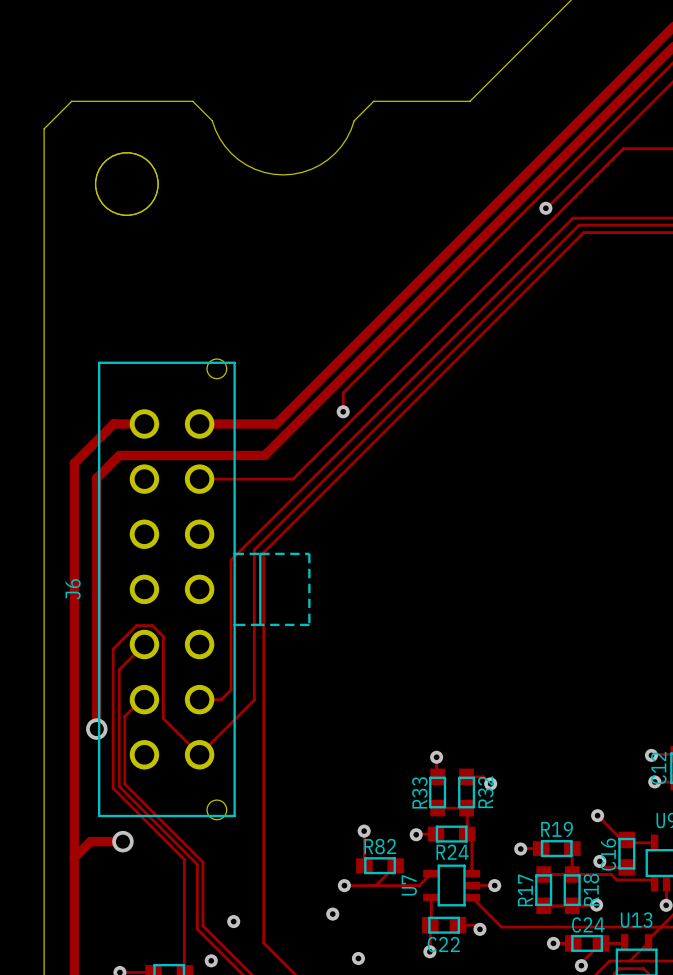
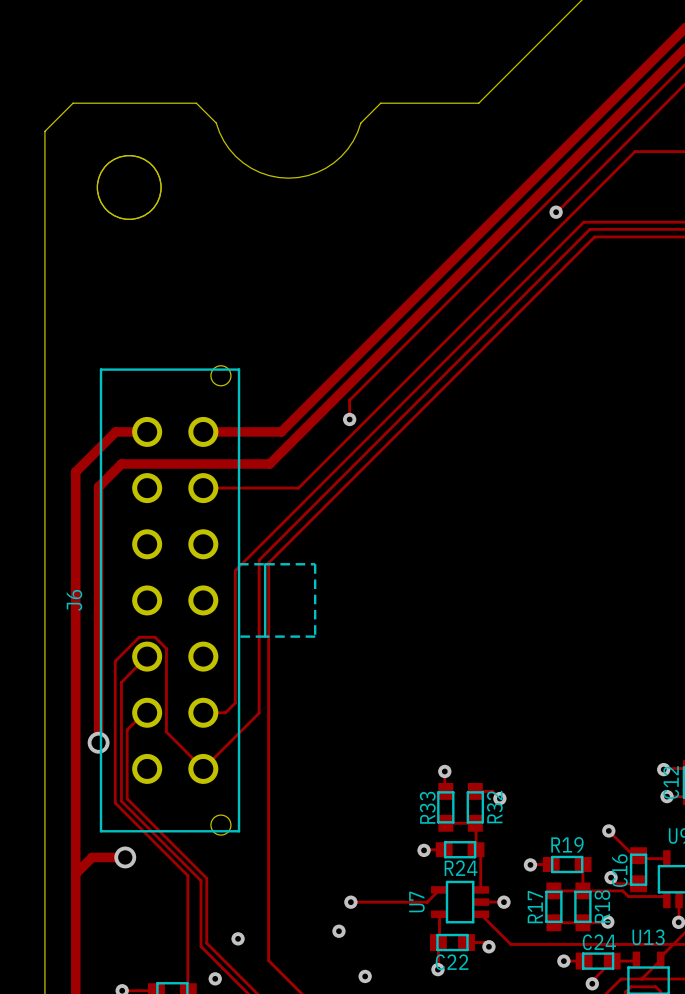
track: (364, 831) (364, 865) -> none
via: (364, 831) -> none
R82: (380, 865) -> none
track: (395, 865) (375, 885) -> none

